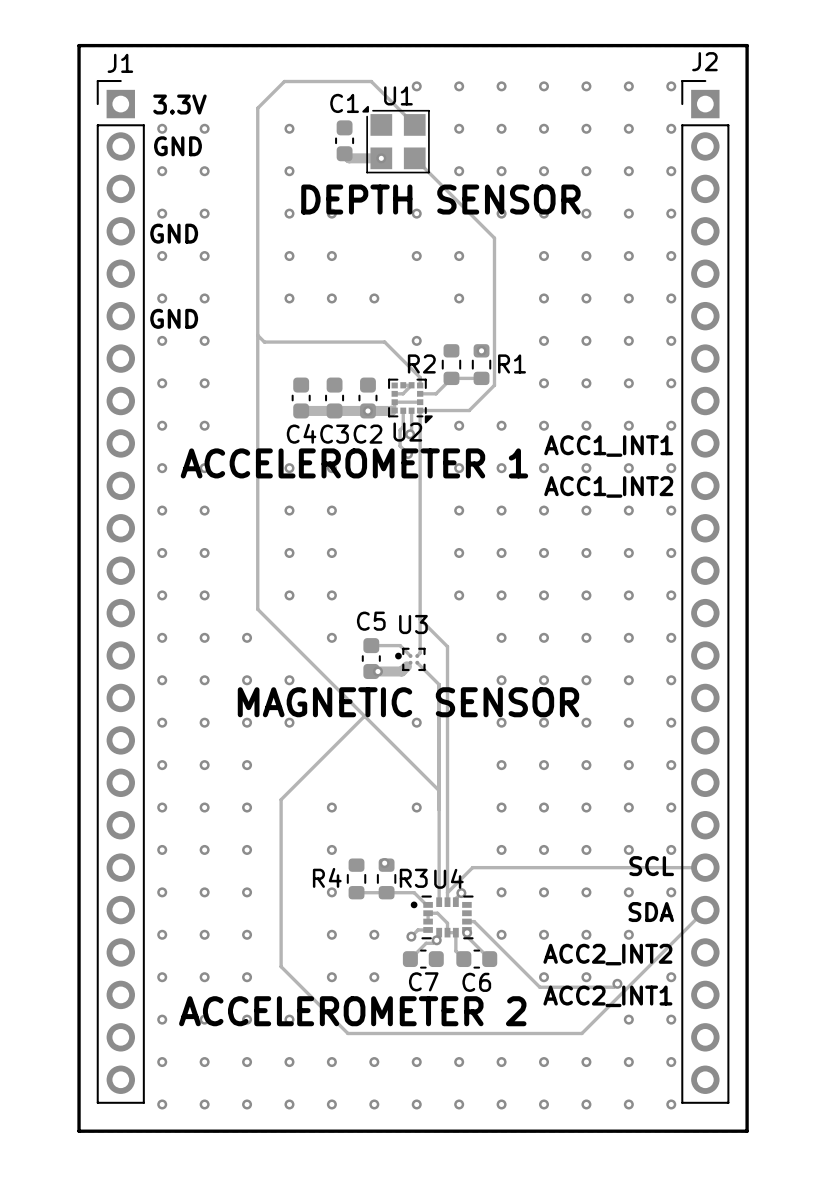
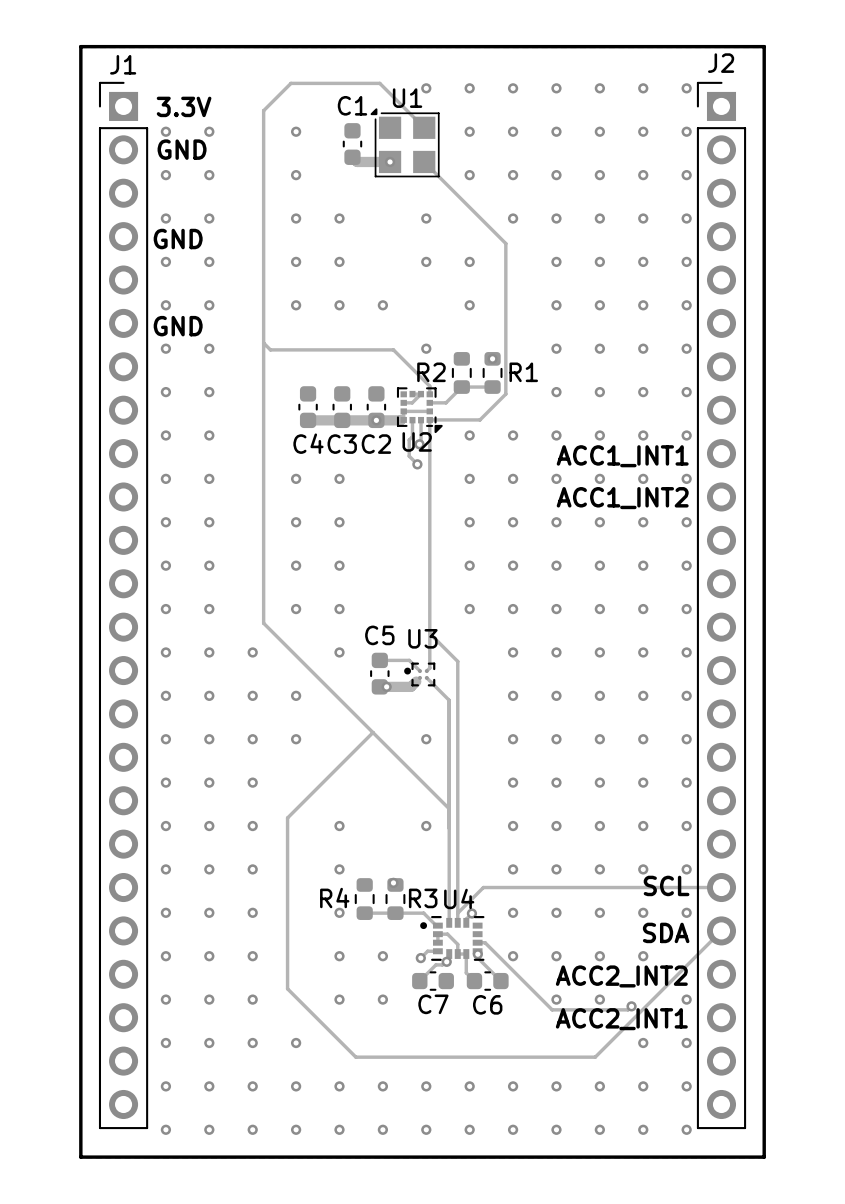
text: DEPTH SENSOR (440, 199) -> none
text: ACCELEROMETER 1 (354, 463) -> none
text: MAGNETIC SENSOR (408, 702) -> none
text: ACCELEROMETER 2 (352, 1011) -> none

